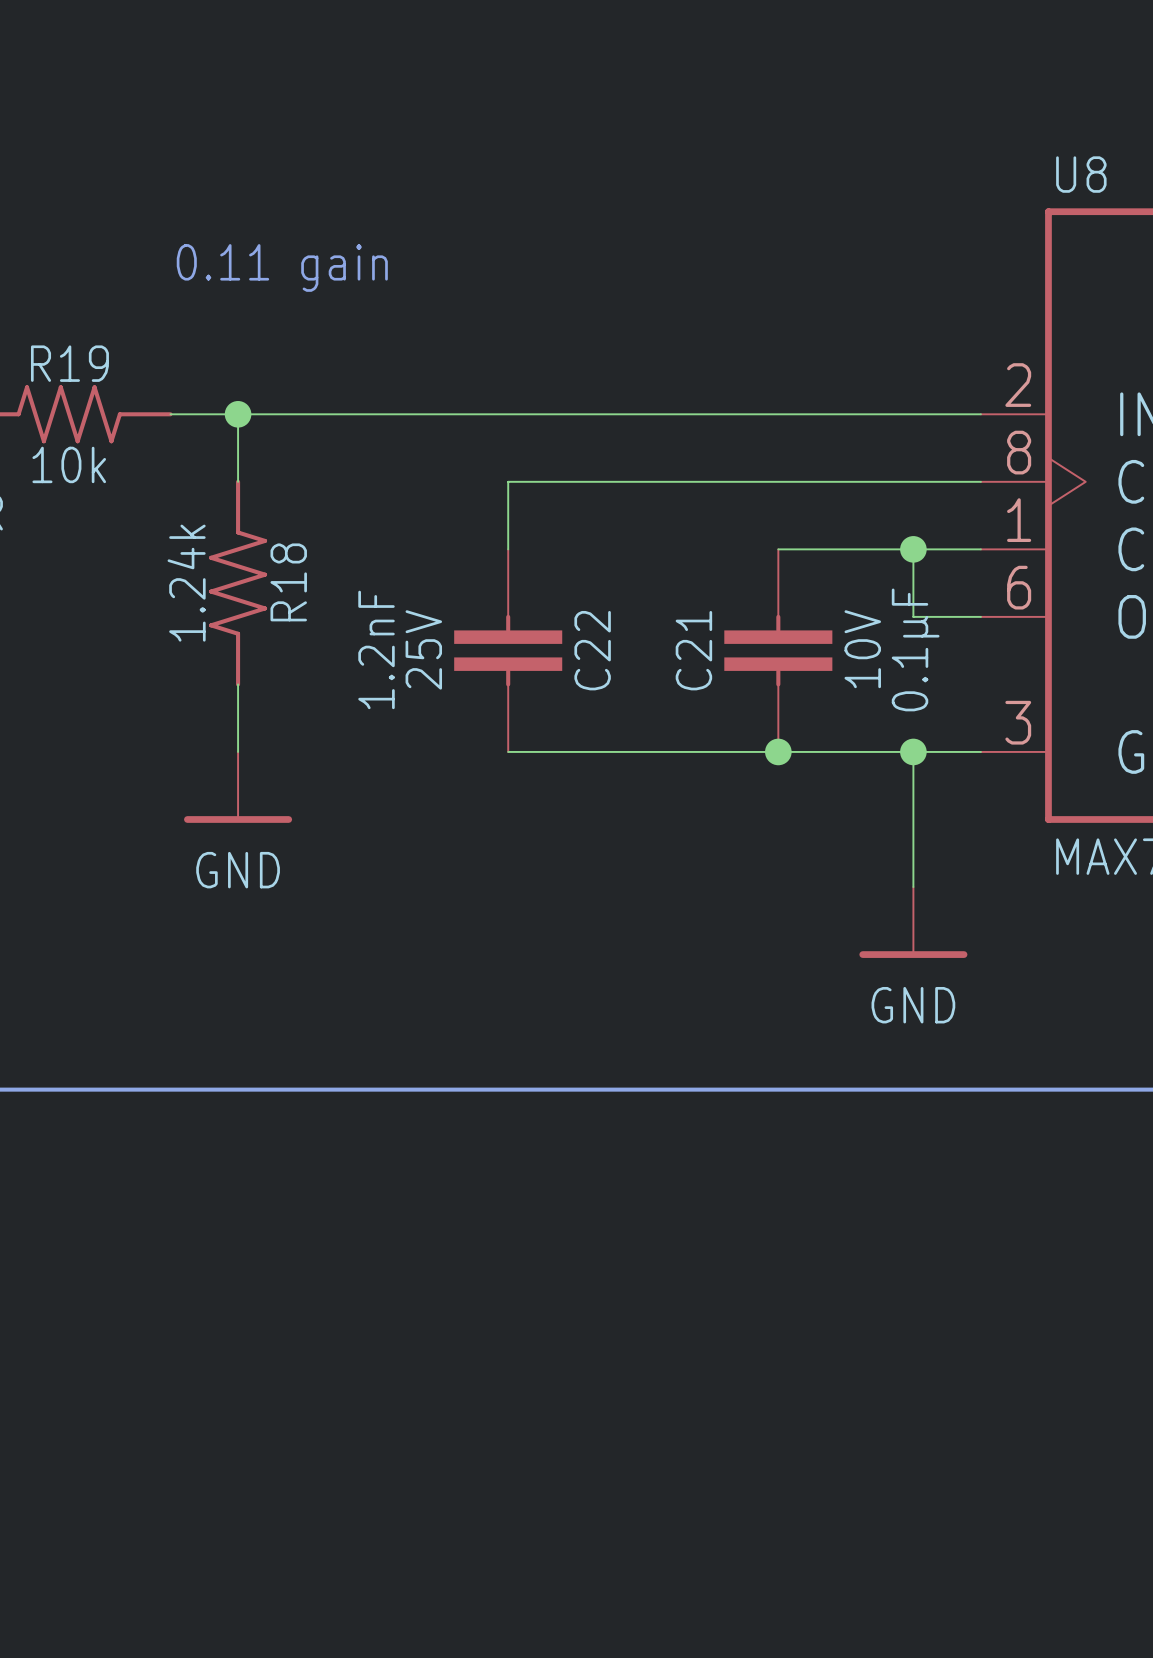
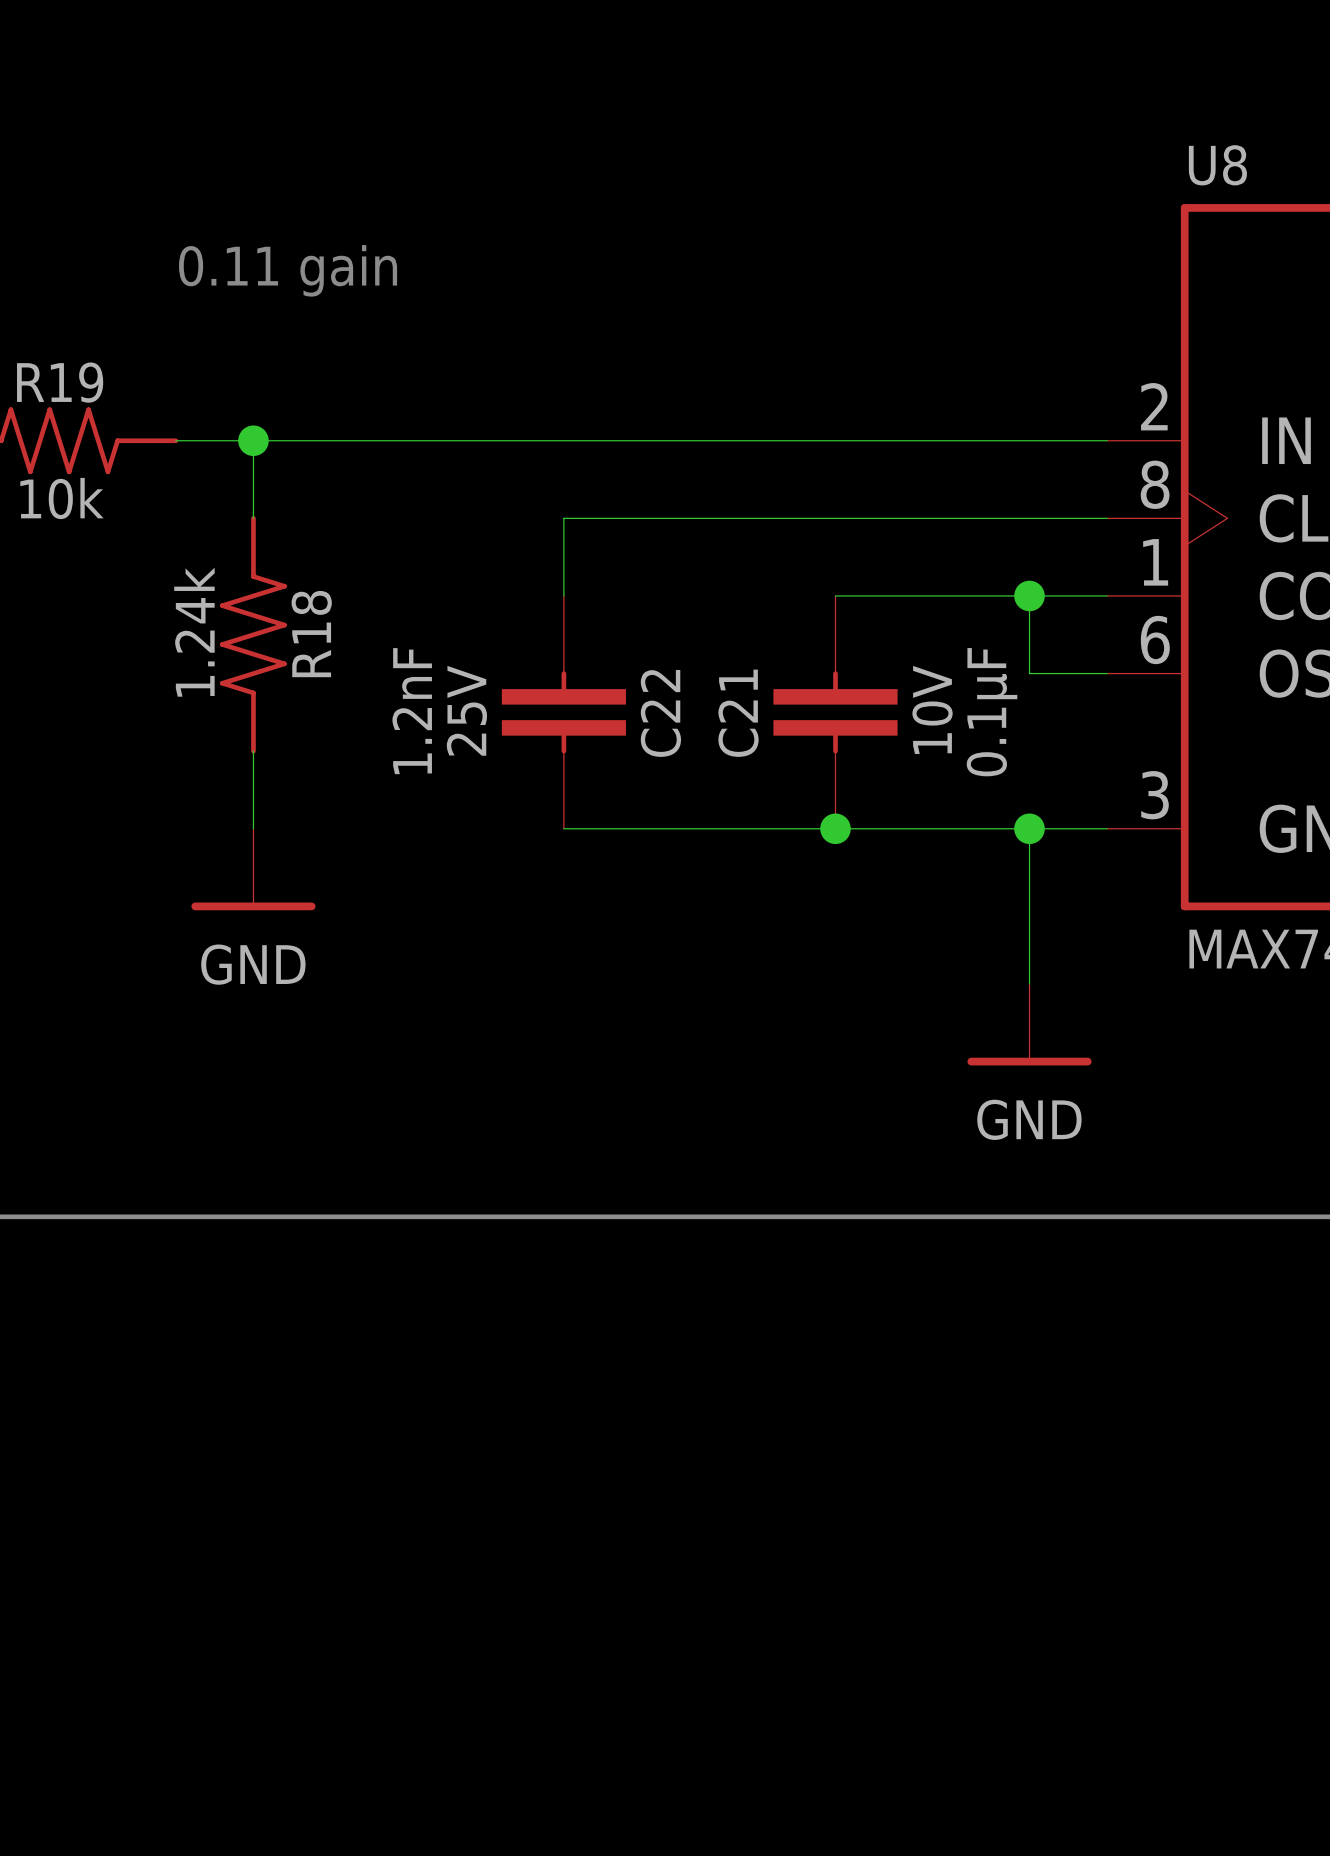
wire: none -> (835, 595) (874, 595)
C21 position: (778, 650) -> (835, 712)
junction position: (778, 751) -> (835, 828)

